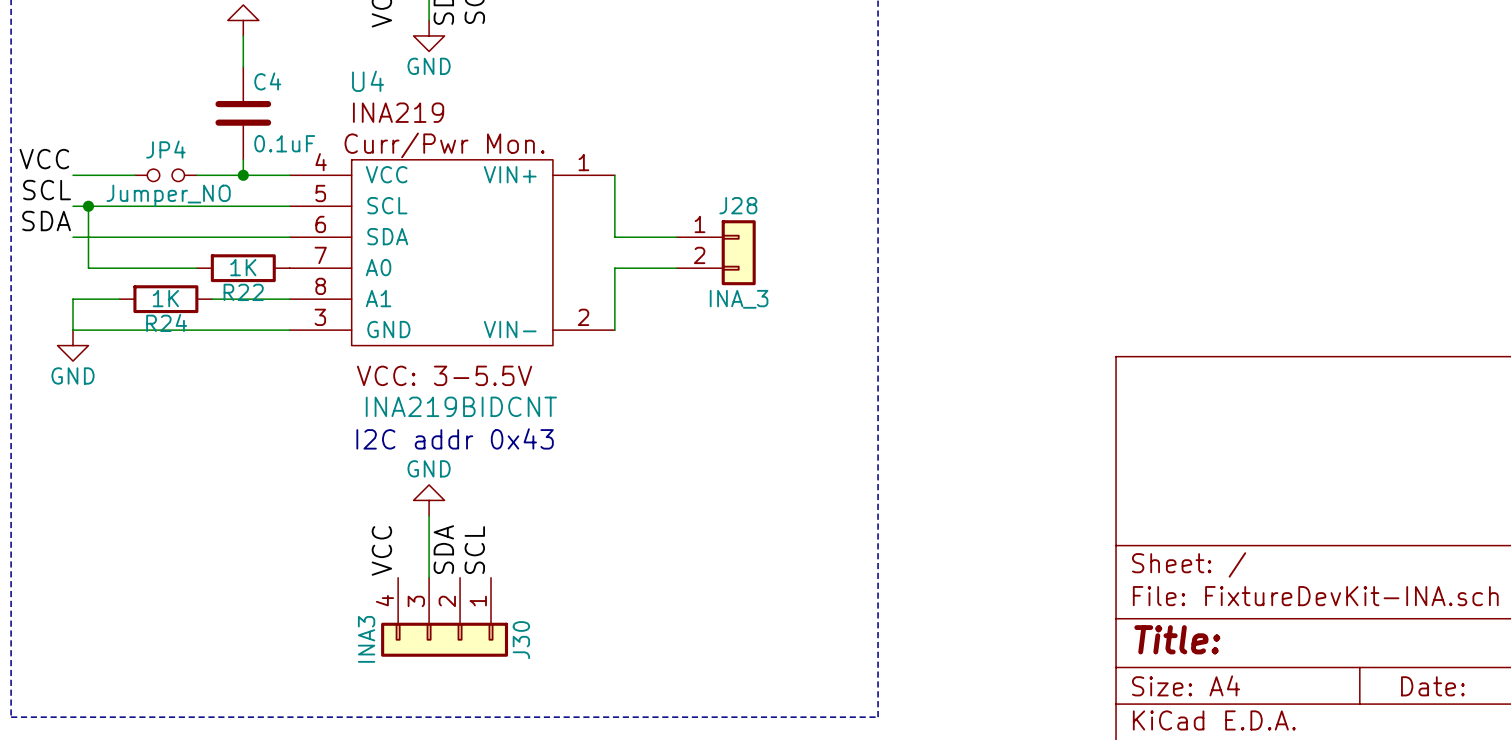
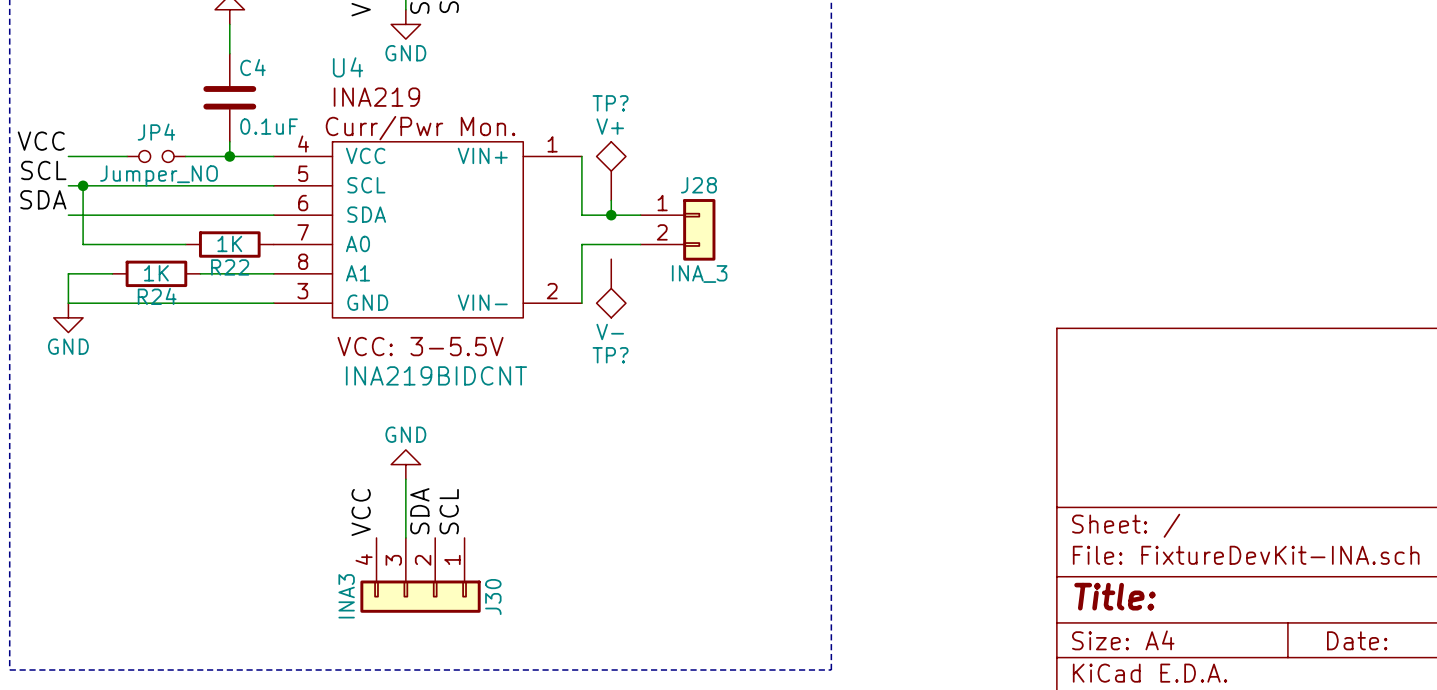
TP?: none -> V+ (611, 171)
wire: none -> (611, 200) (611, 215)
junction: none -> (611, 215)
TP?: none -> V- (611, 288)
text: I2C addr 0x43 (455, 438) -> none

